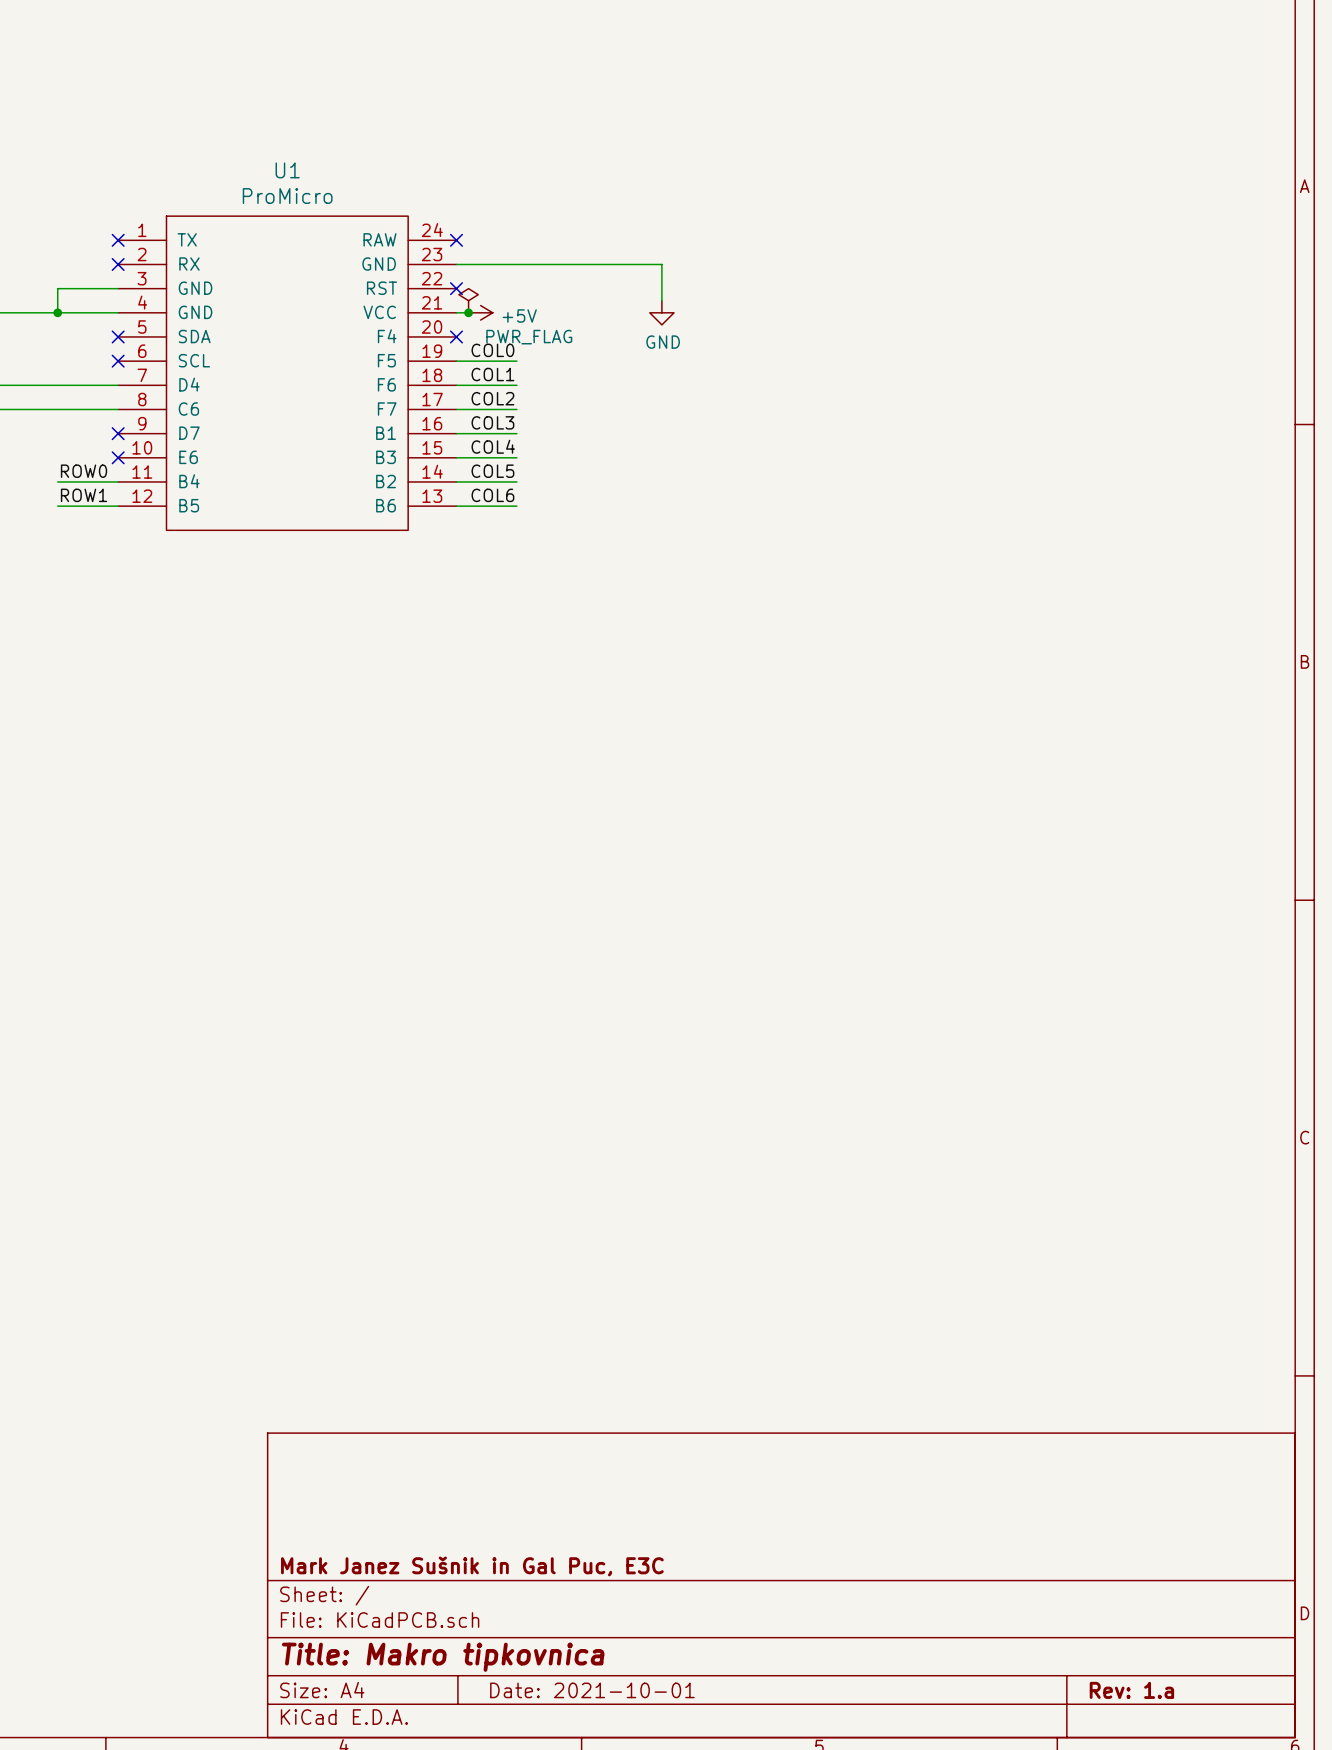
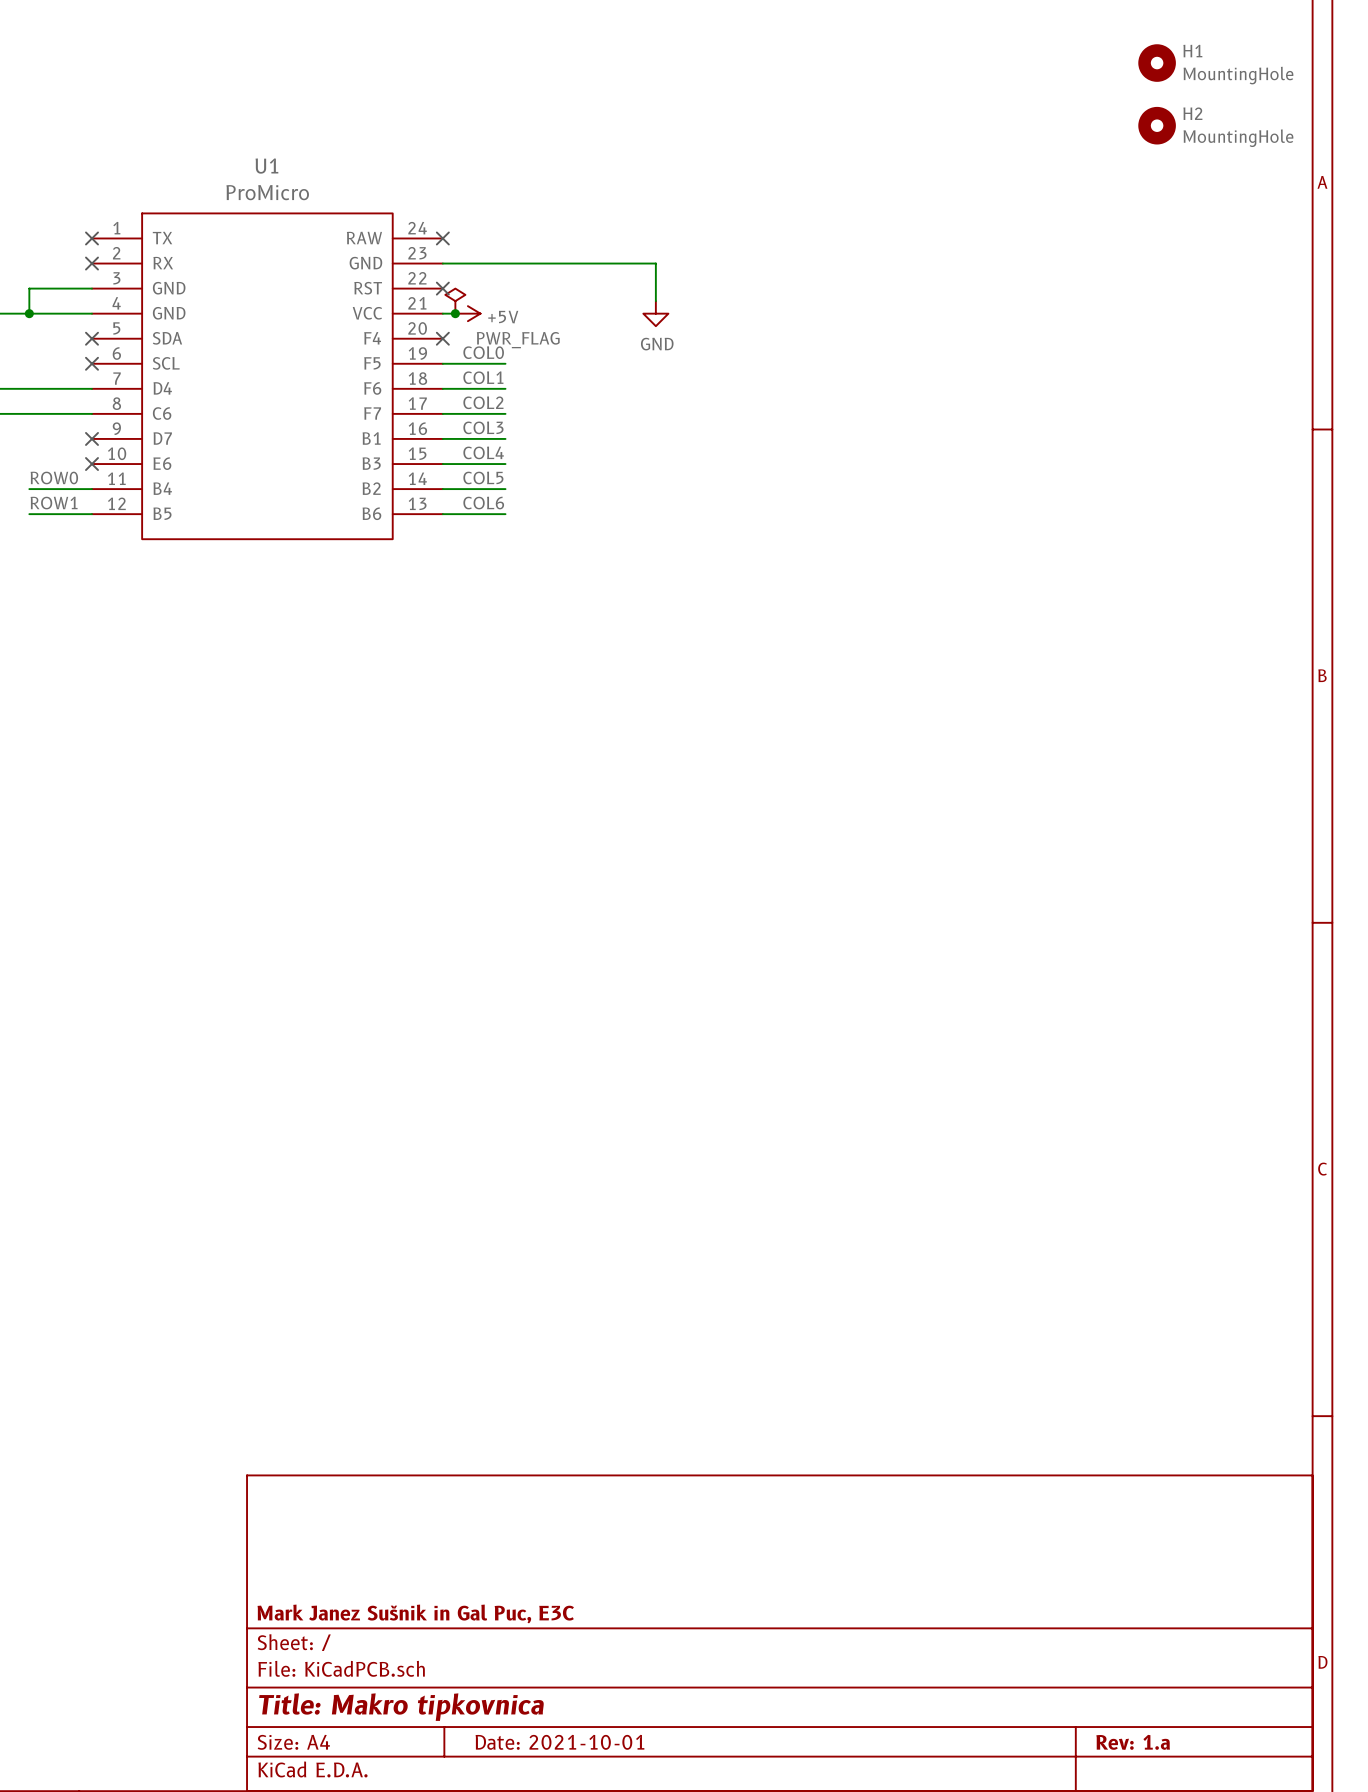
H1: none -> MountingHole (1157, 63)
H2: none -> MountingHole (1157, 125)

